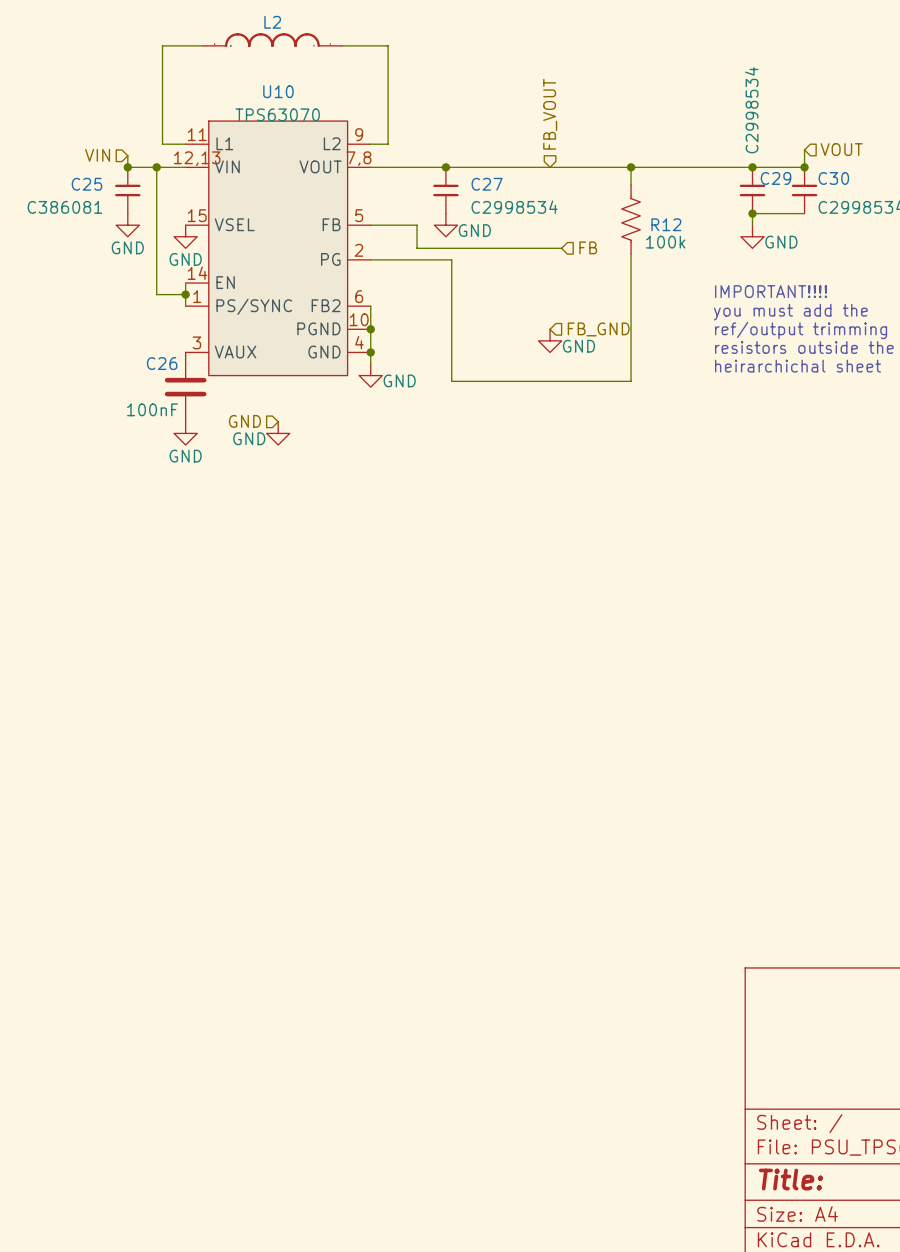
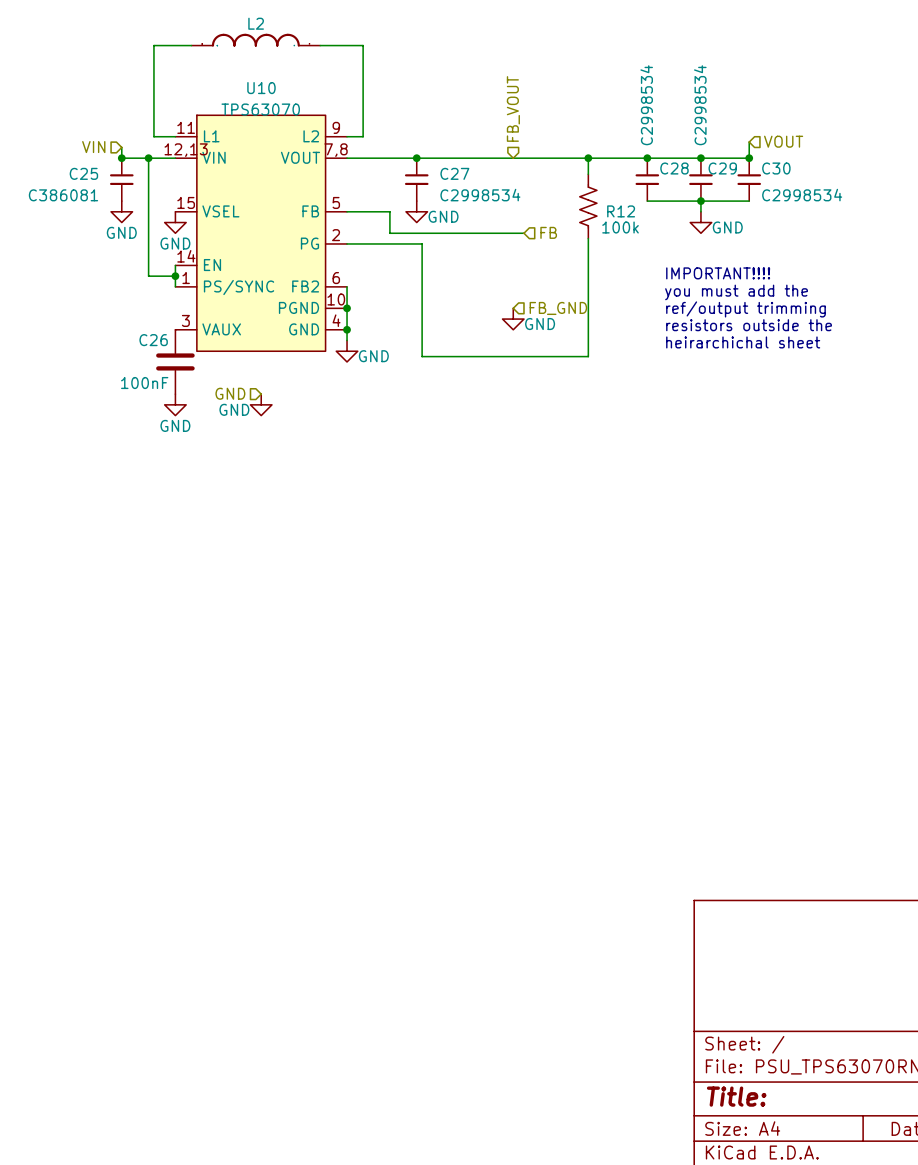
junction: none -> (647, 158)
C28: none -> C2998534 (647, 179)
wire: none -> (647, 201) (700, 201)

